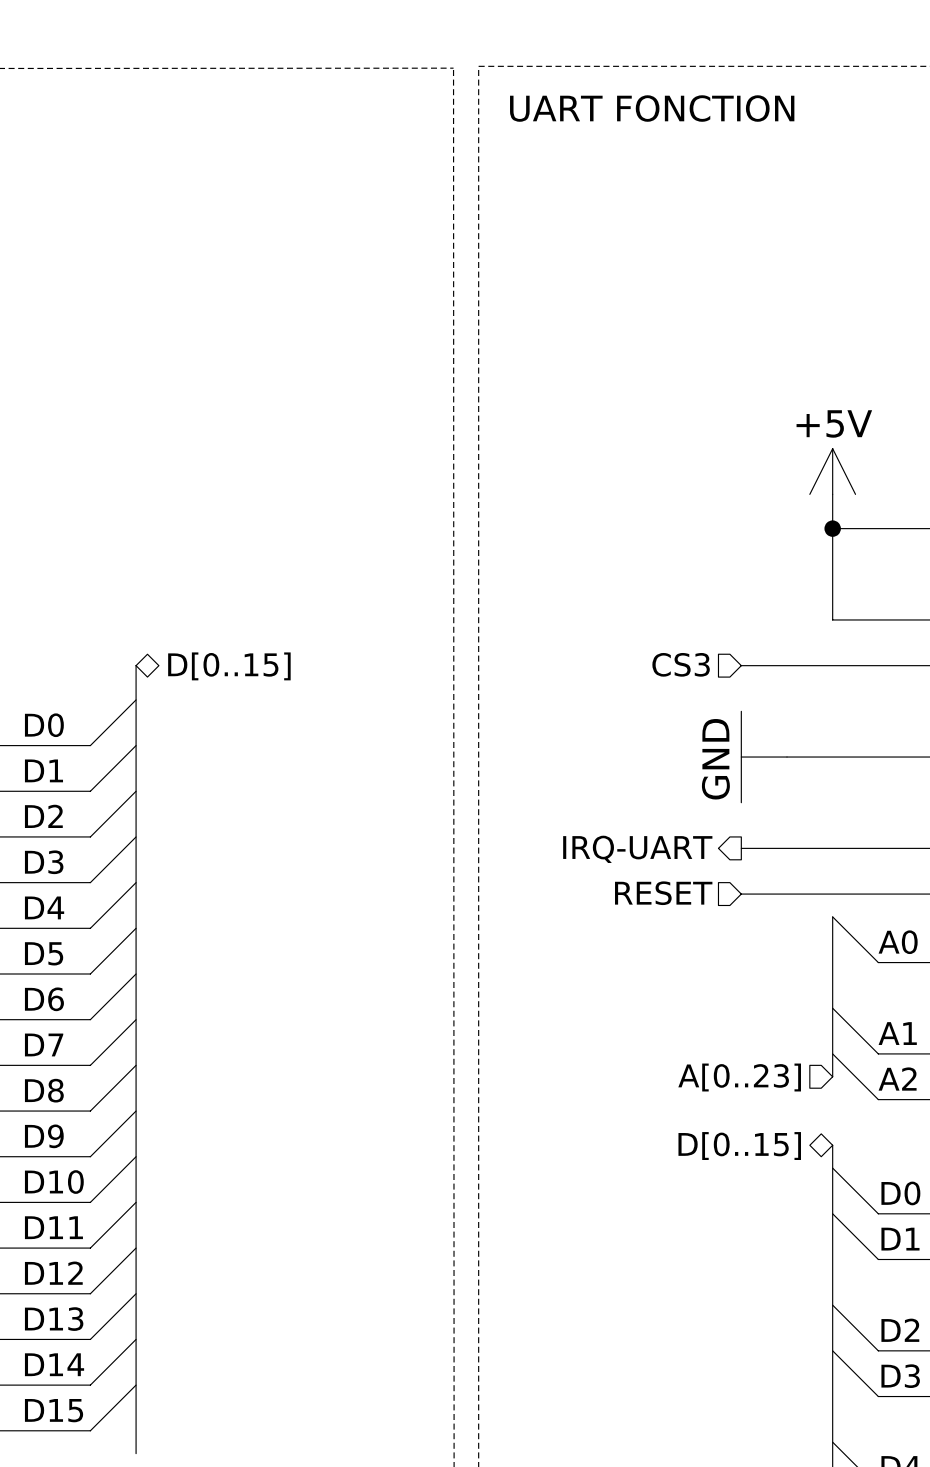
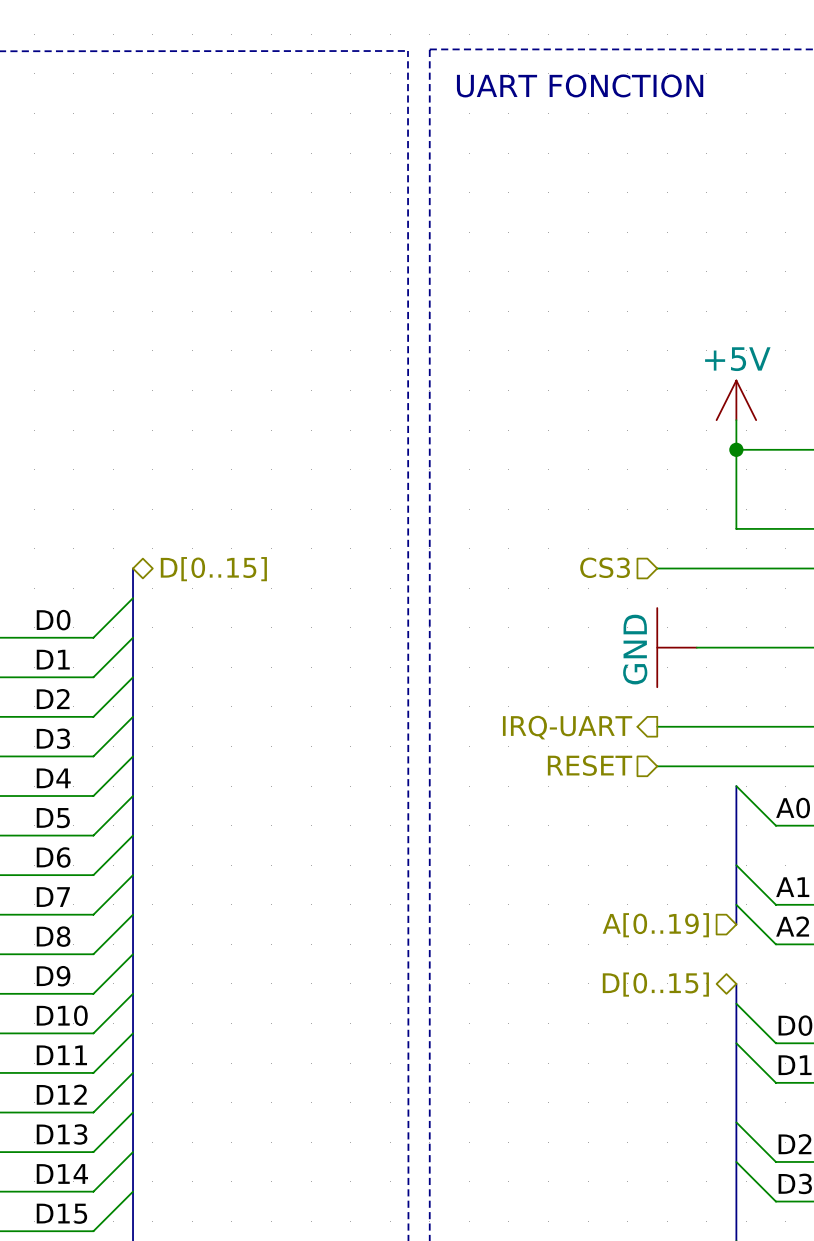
hierarchical label: A[0..23] (739, 1077) -> A[0..19] (655, 925)

